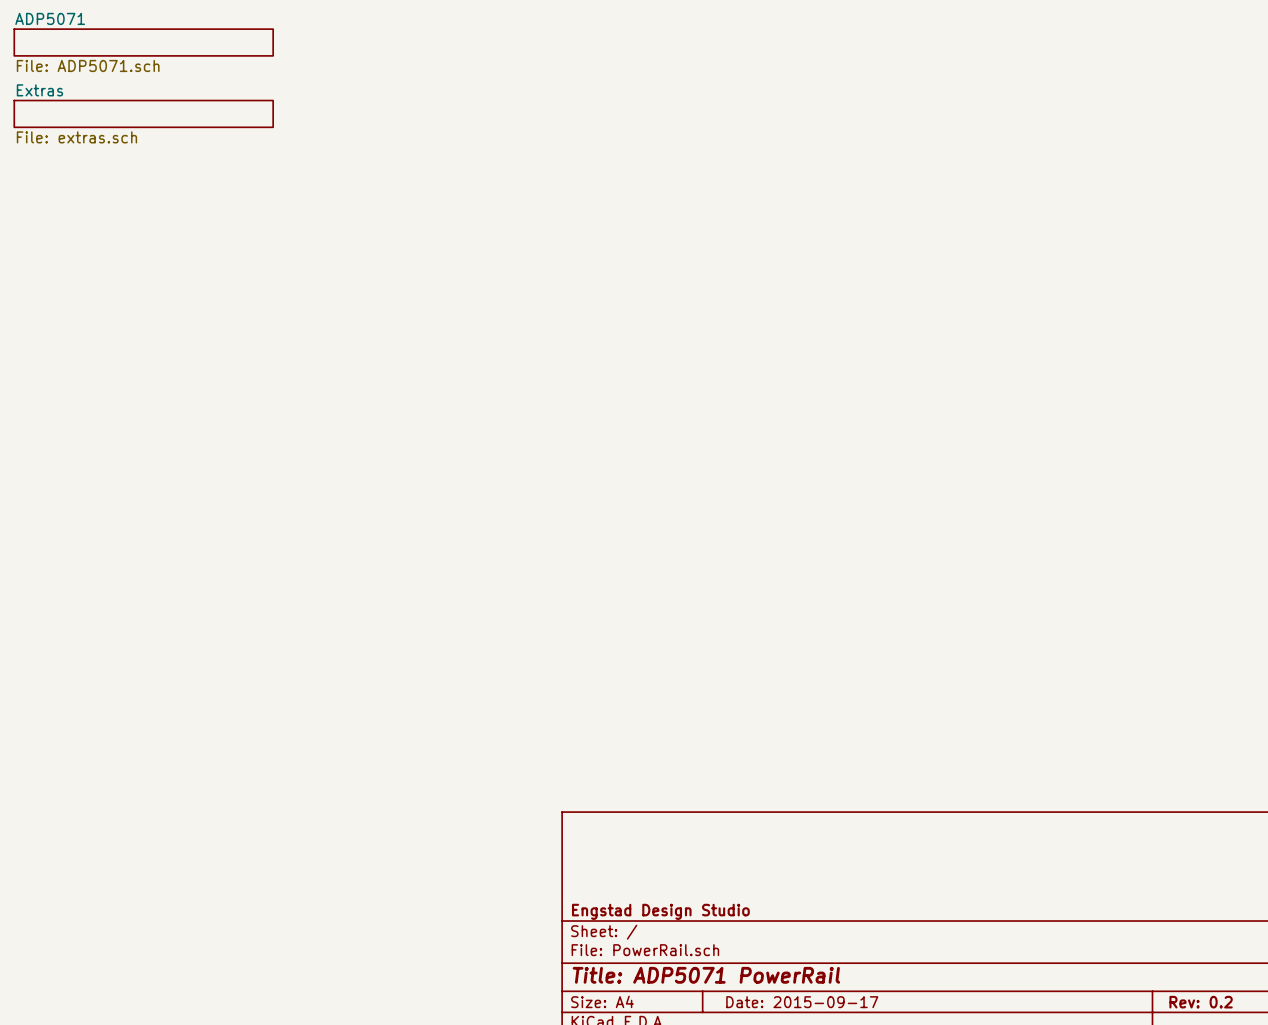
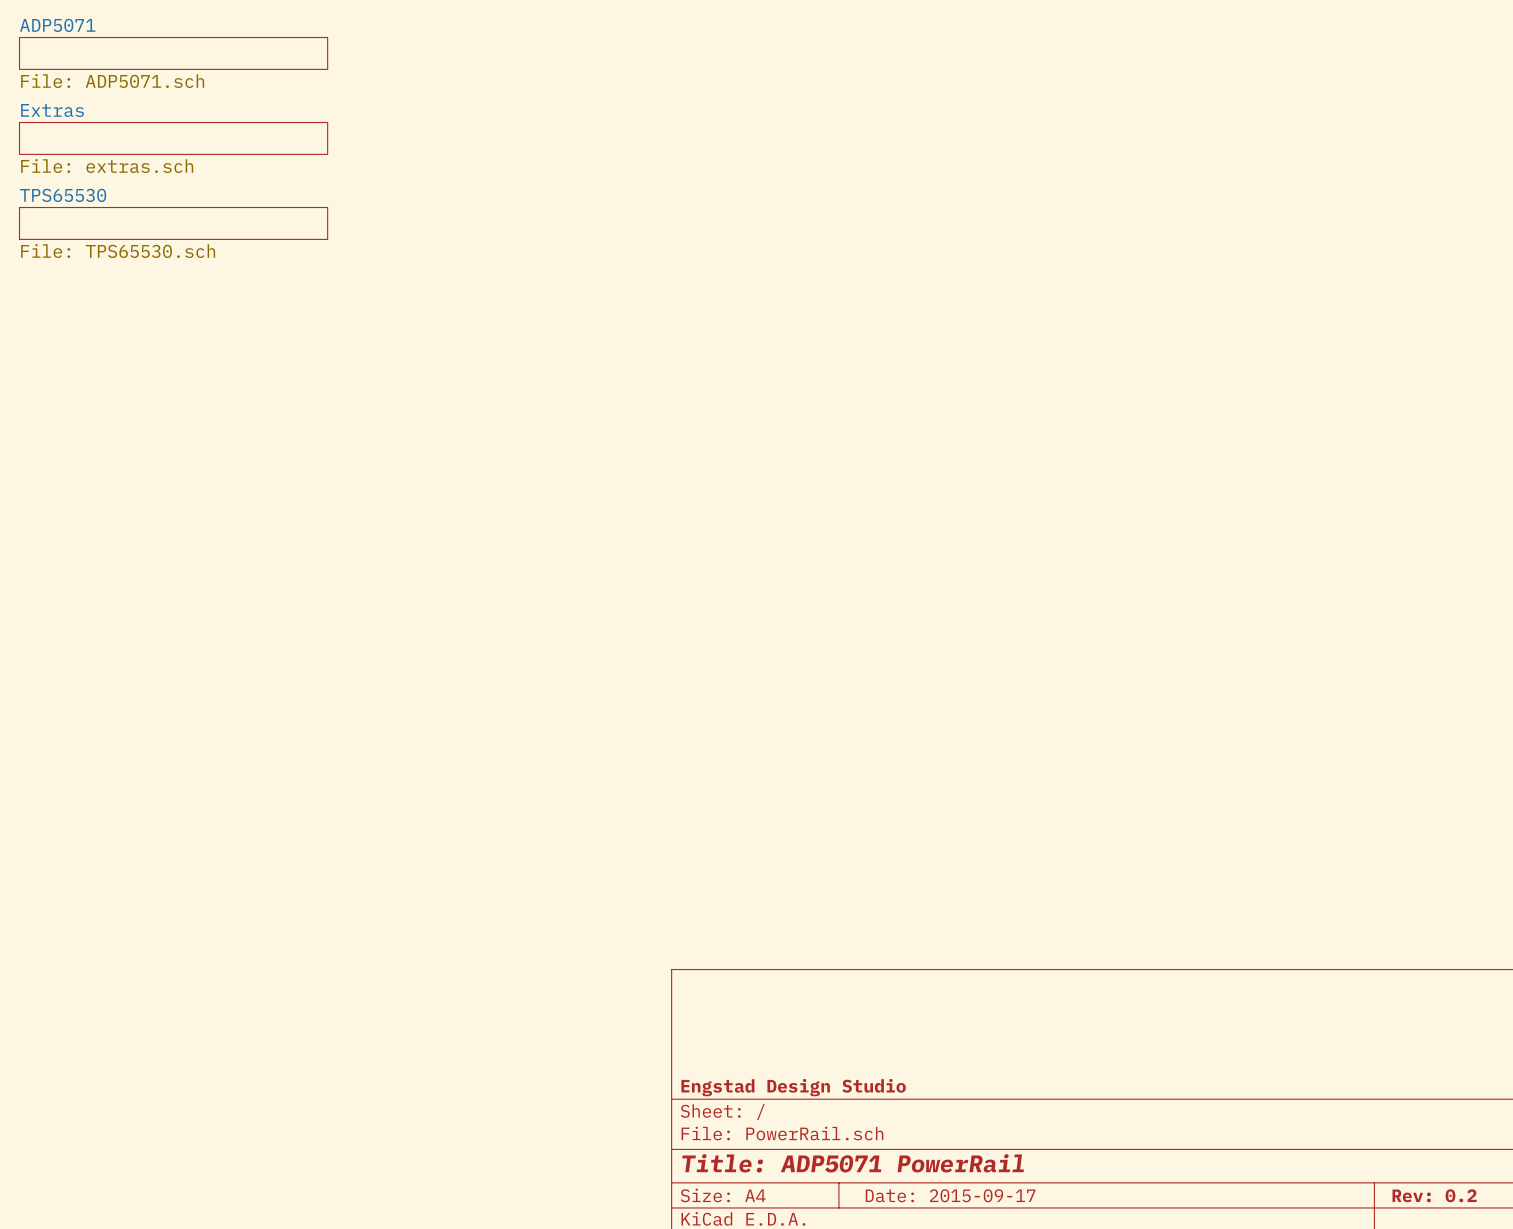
sheet TPS65530: none -> File: TPS65530.sch (173, 223)

